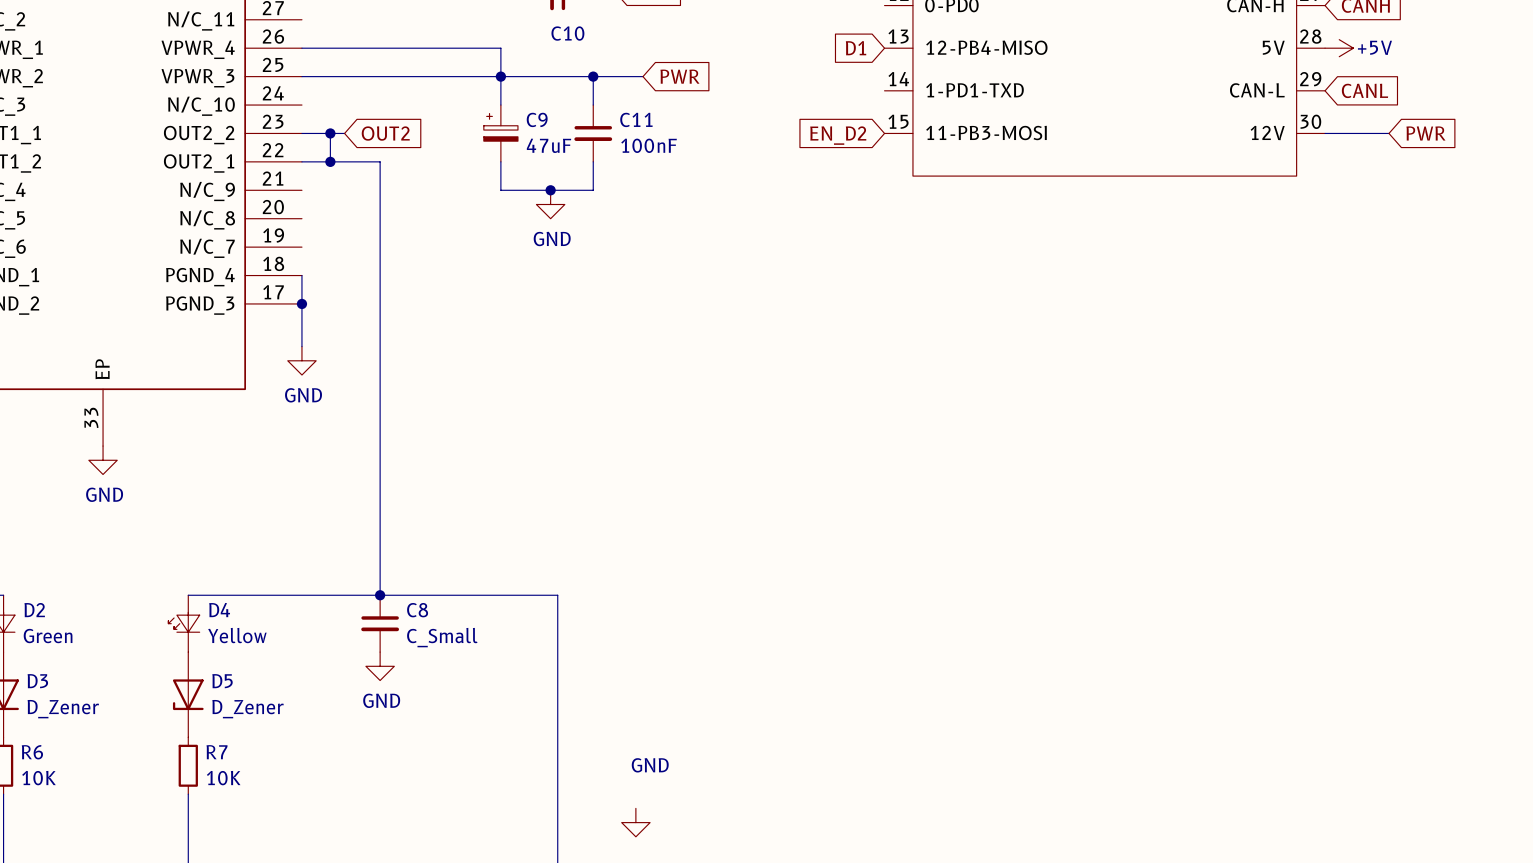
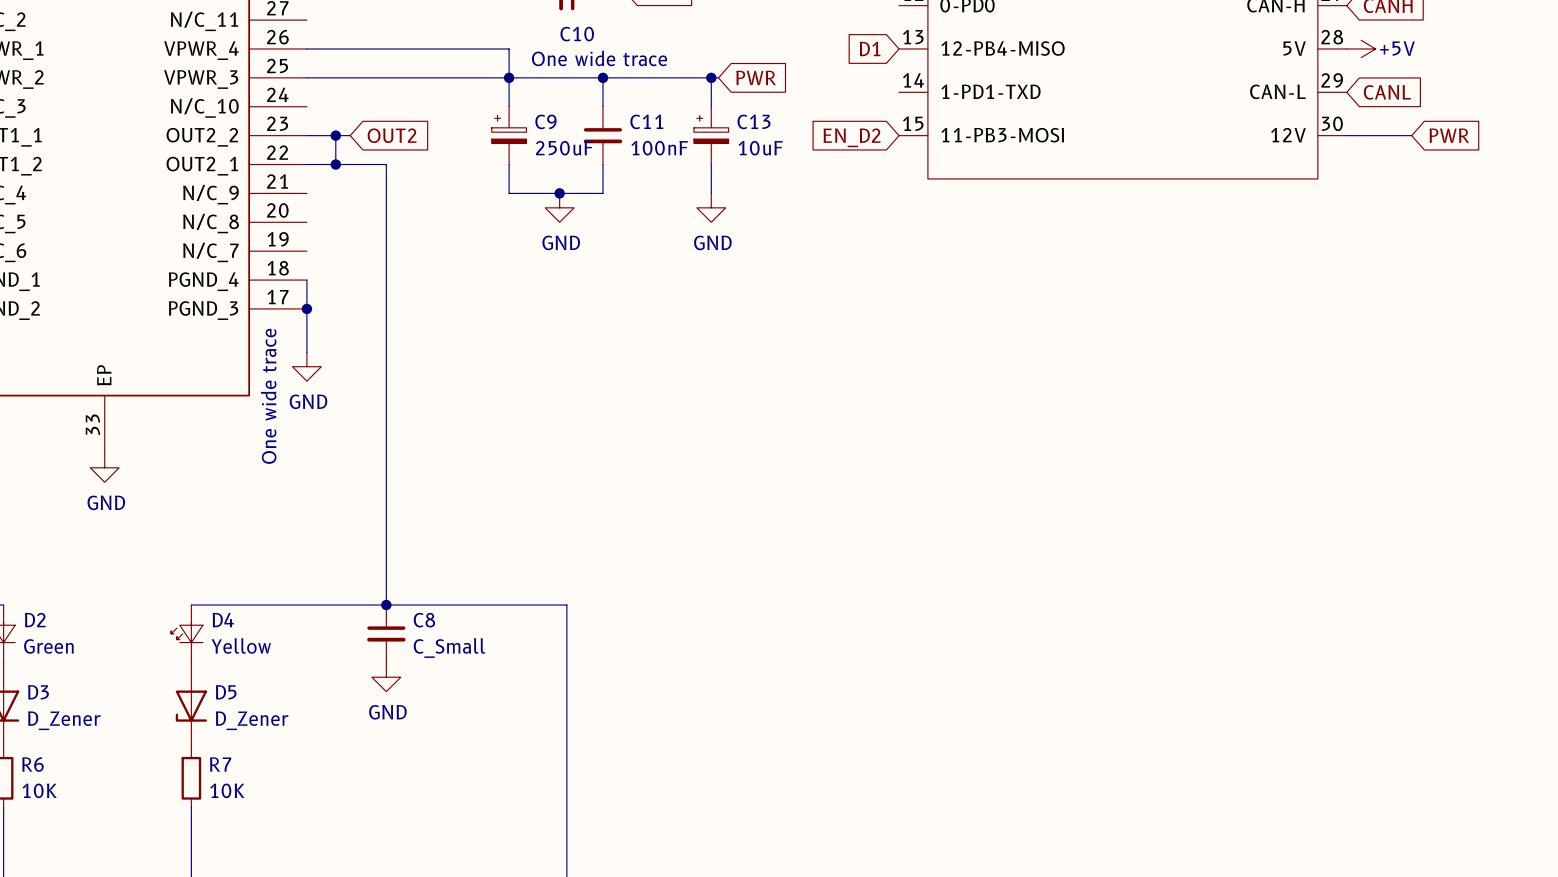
text: none -> One wide trace (599, 58)
wire: none -> (653, 77) (718, 77)
global label position: PWR (679, 76) -> PWR (756, 77)
wire: none -> (711, 77) (711, 106)
junction: none -> (711, 77)
C13: none -> 10uF (711, 135)
C9 value: 47uF (549, 145) -> 250uF (564, 148)
wire: none -> (711, 164) (711, 193)
power symbol: none -> GND (711, 207)
text: none -> One wide trace (268, 396)
power symbol: GND (635, 822) -> none

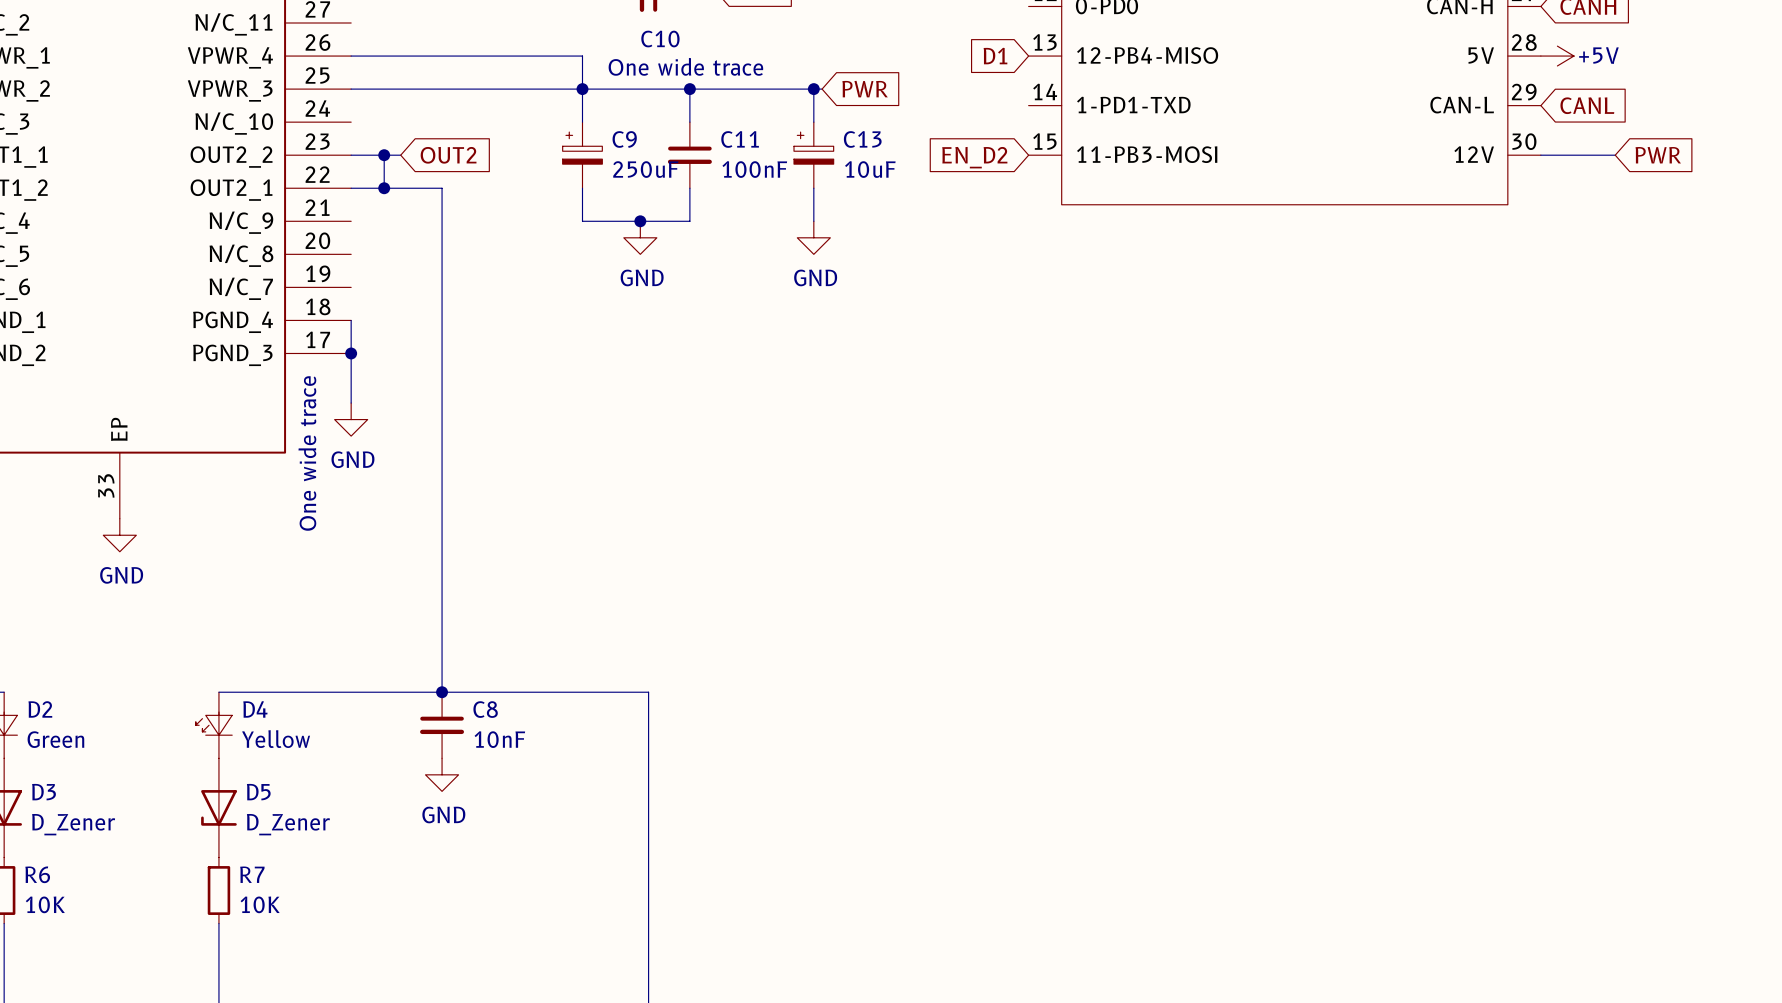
C8 value: C_Small (449, 648) -> 10nF (499, 739)

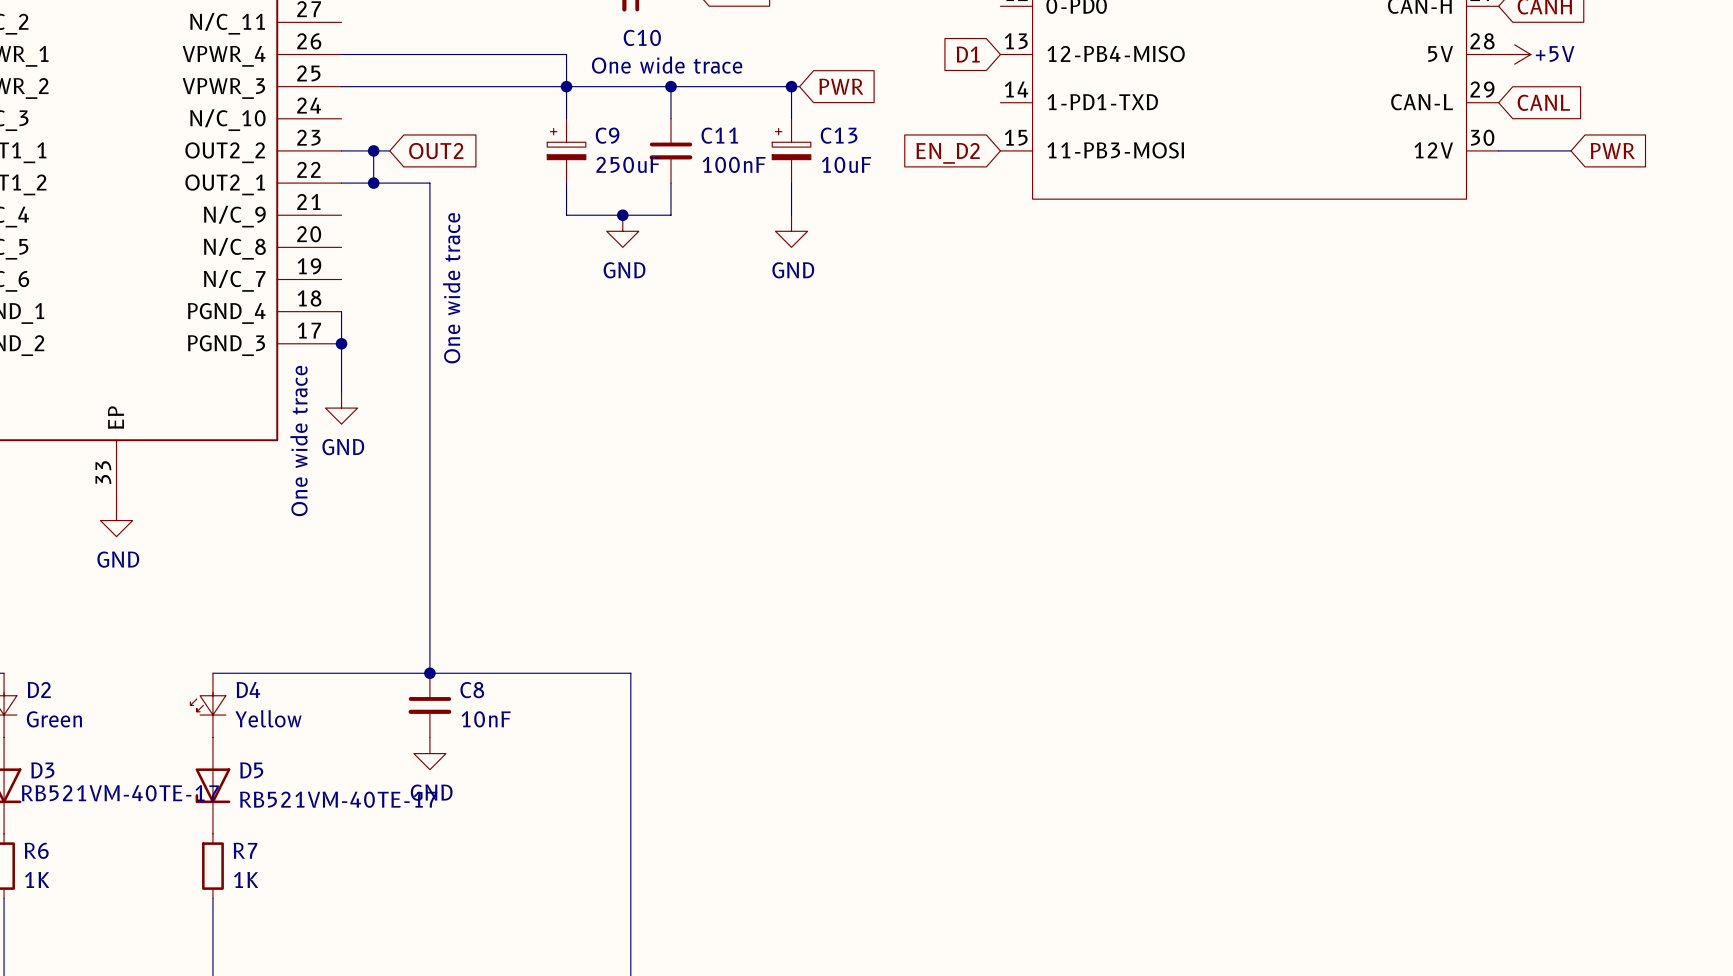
text: none -> One wide trace (451, 288)
D3 value: D_Zener (73, 824) -> RB521VM-40TE-17 (120, 793)
D5 value: D_Zener (288, 824) -> RB521VM-40TE-17 (338, 799)
R6 value: 10K (45, 904) -> 1K (37, 879)
R7 value: 10K (260, 904) -> 1K (246, 879)

